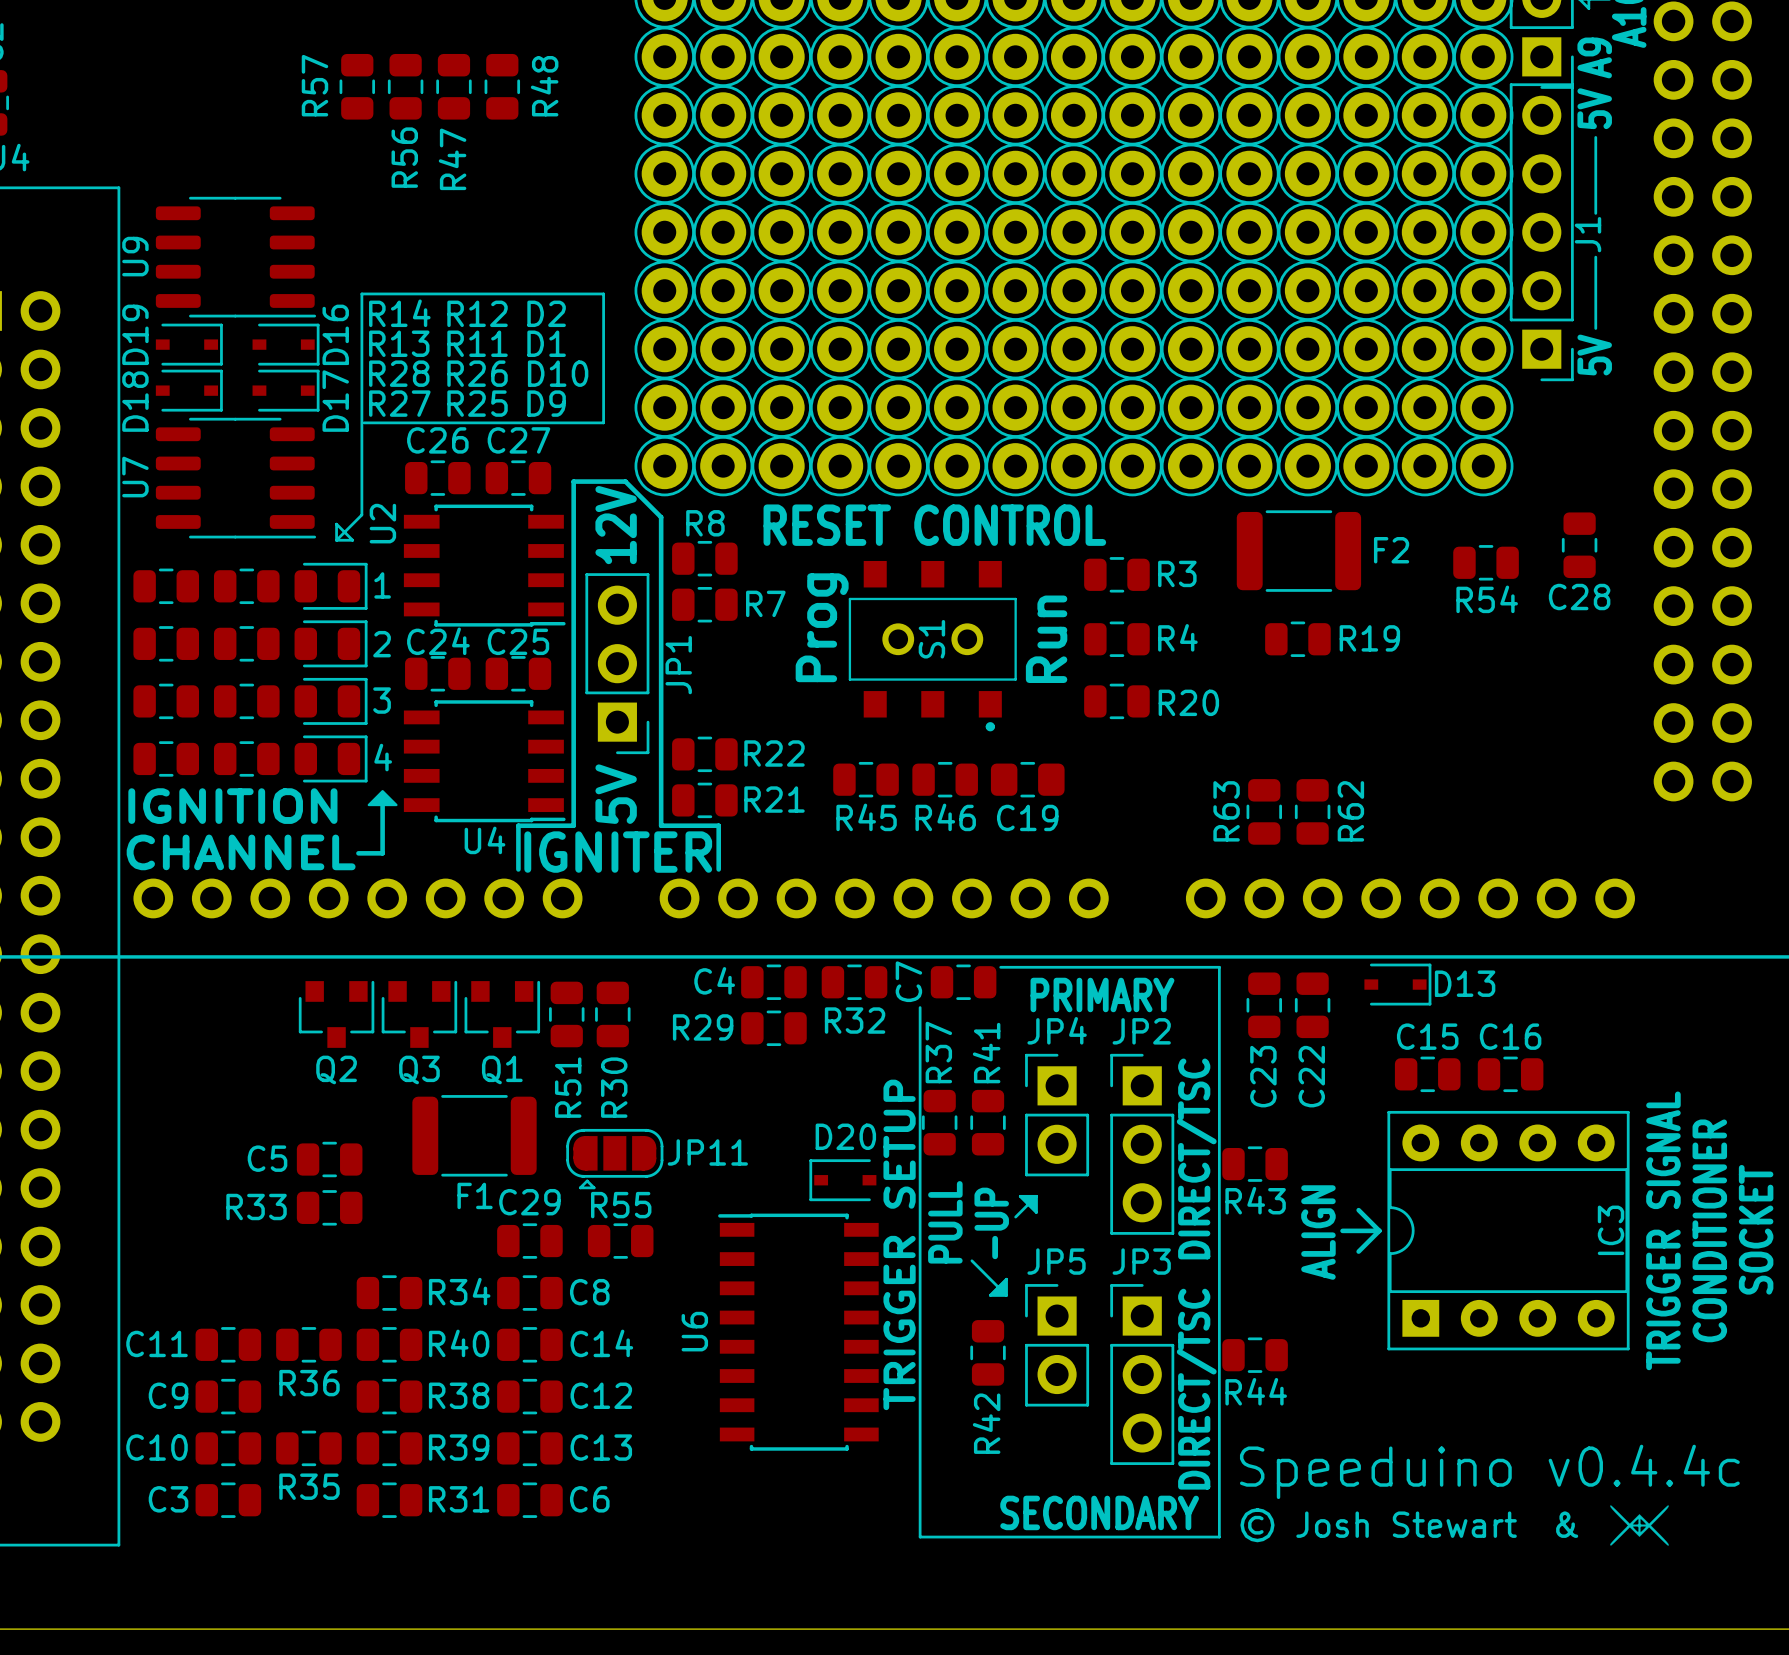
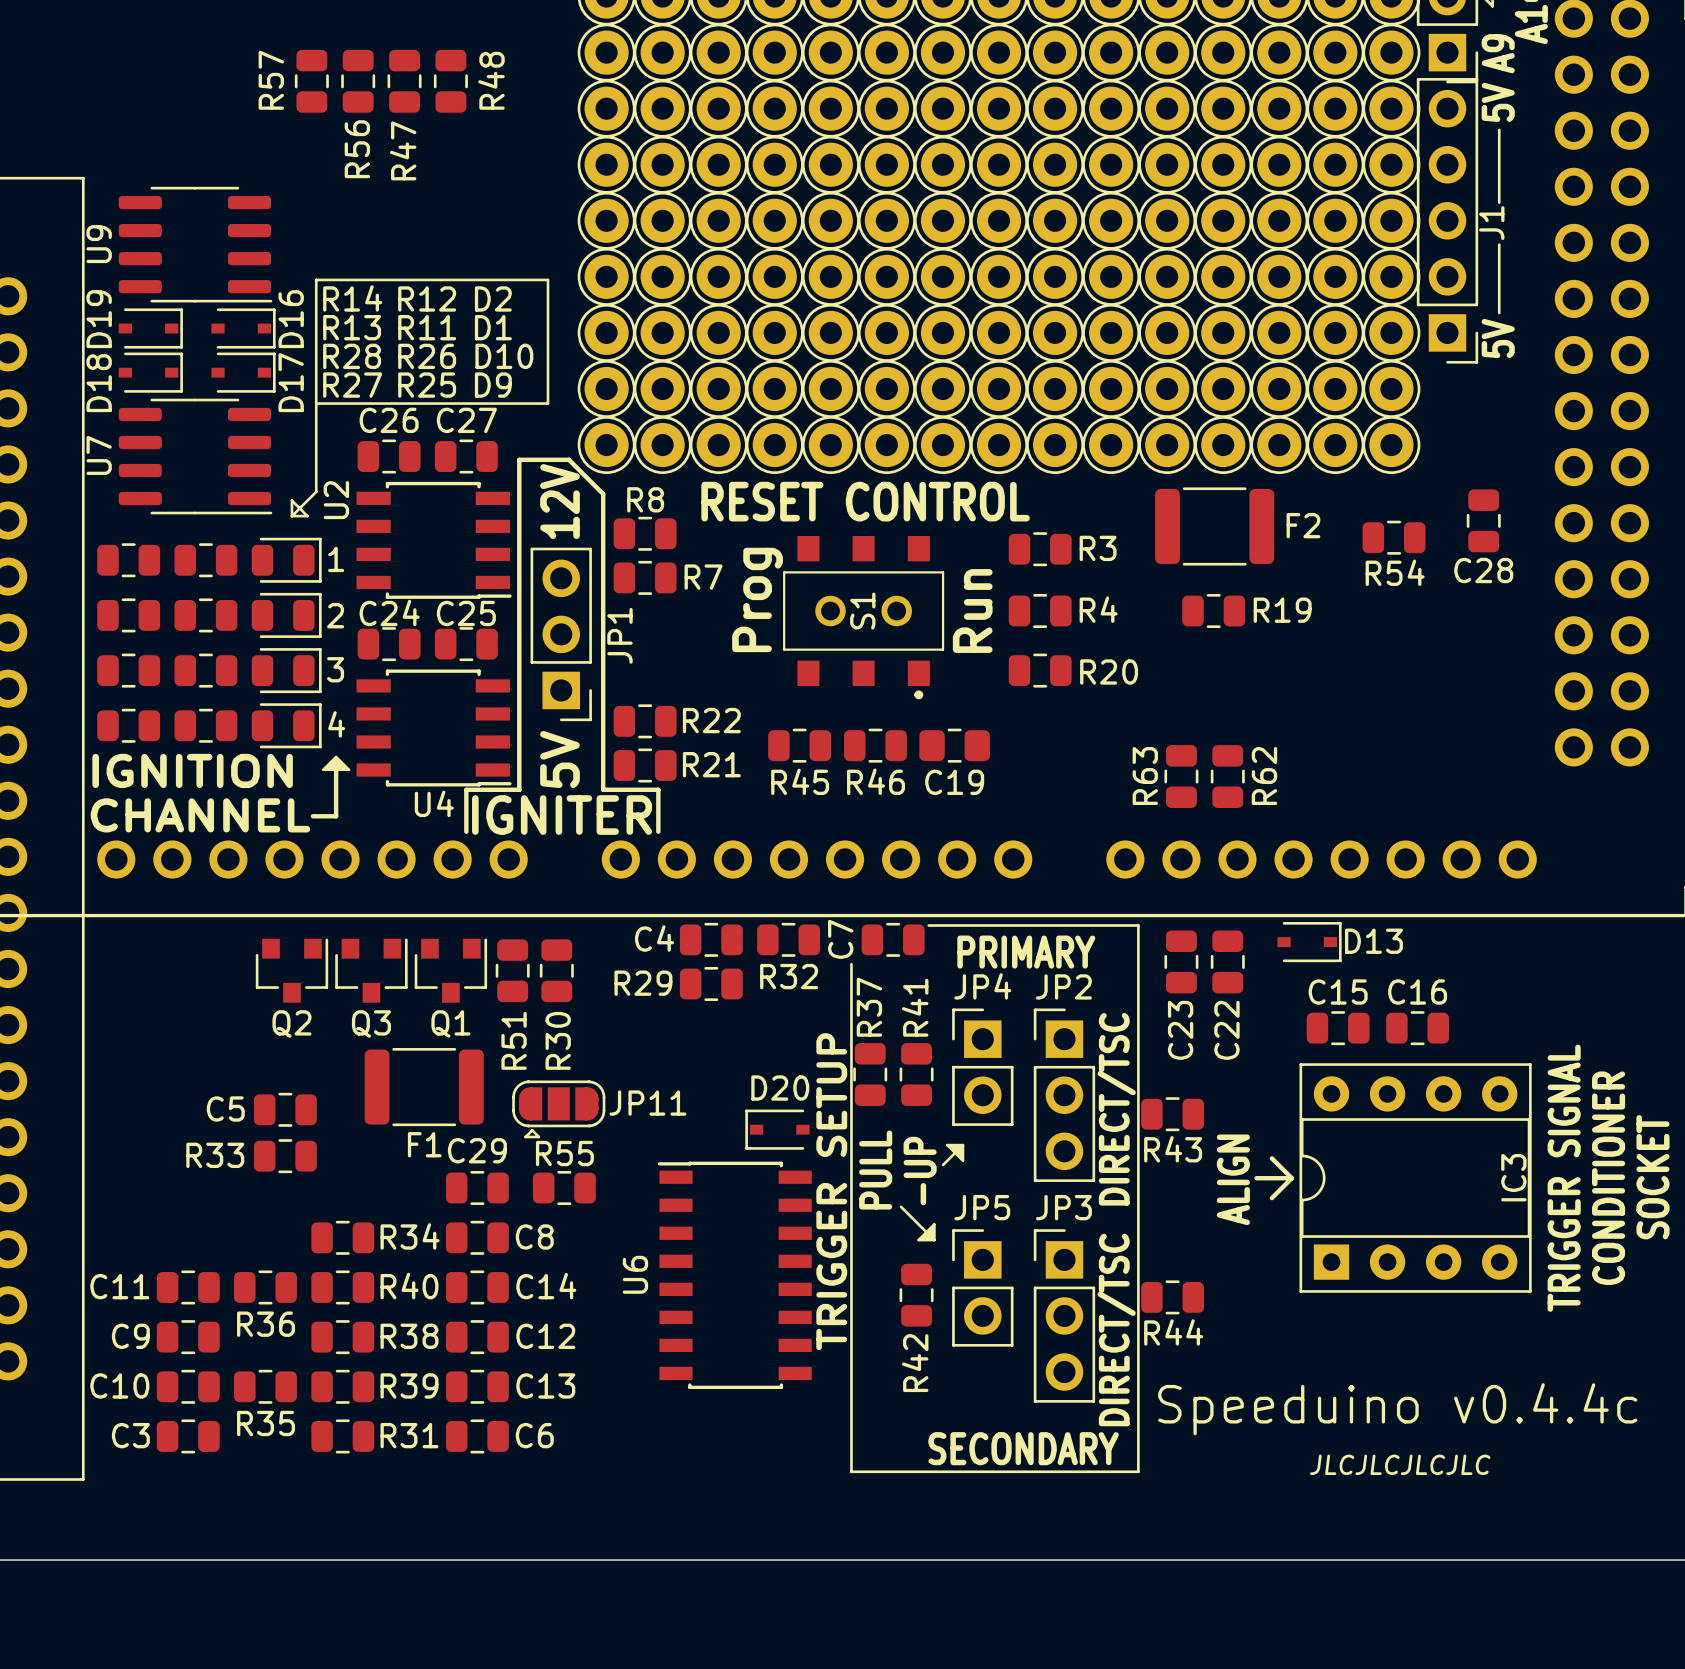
drawing: [1610, 1505, 1669, 1546] -> none
text: © Josh Stewart & (1409, 1525) -> none
text: none -> JLCJLCJLCJLC (1400, 1464)

